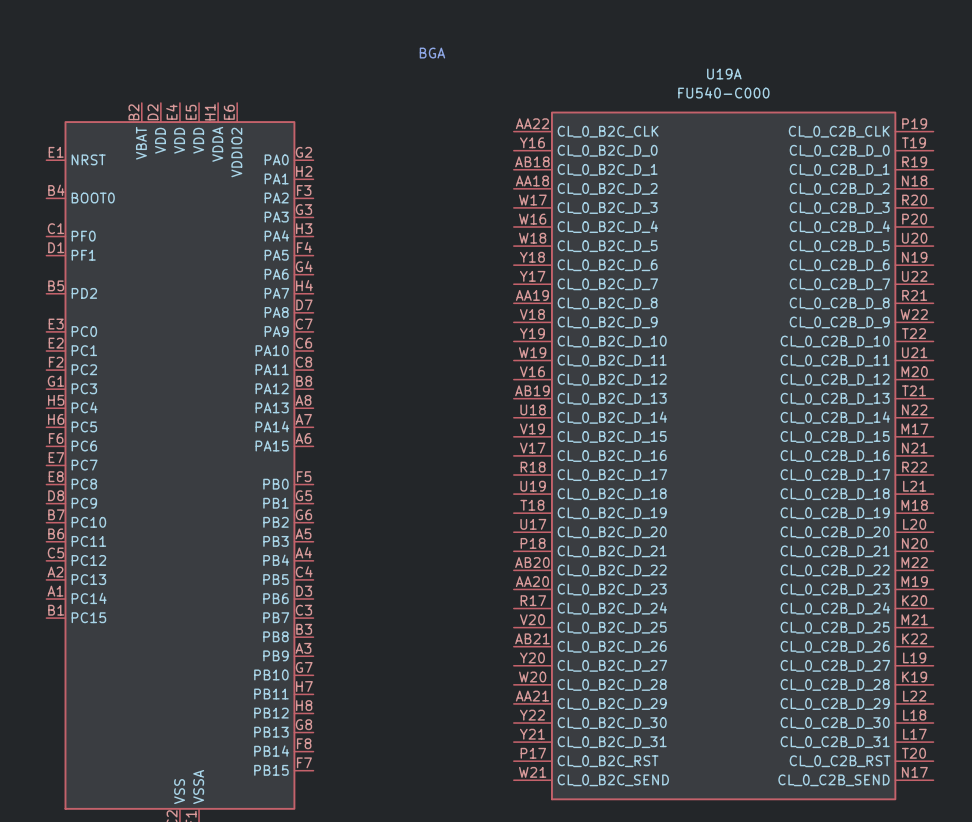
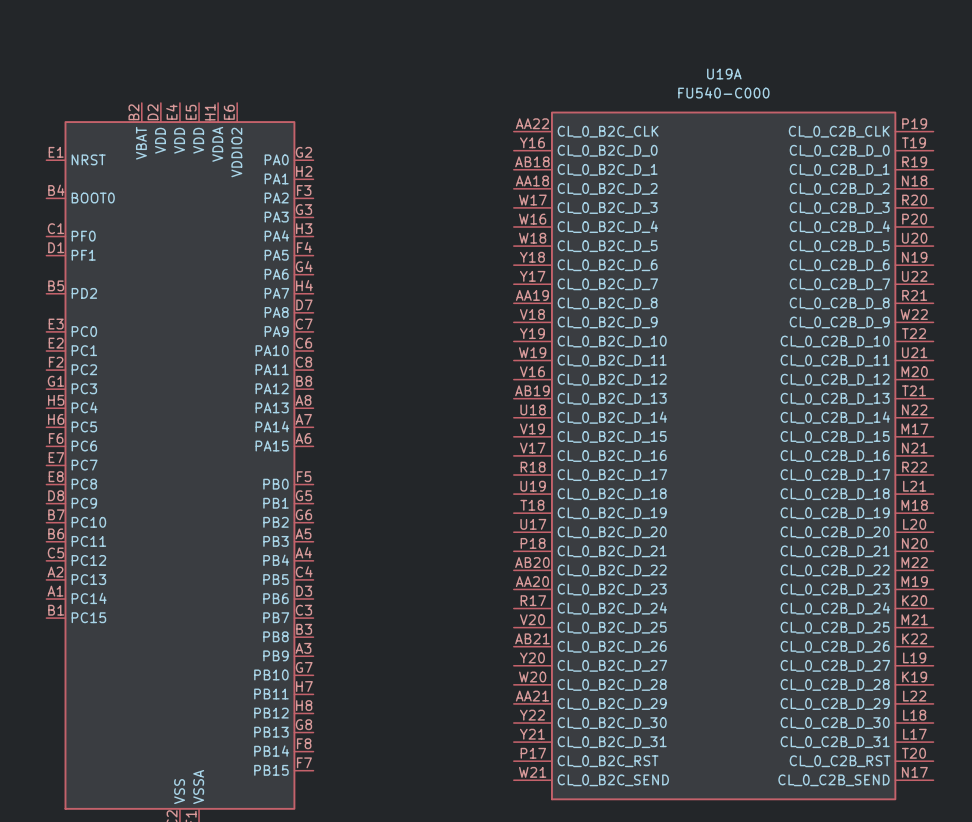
text: BGA (432, 53) -> none

